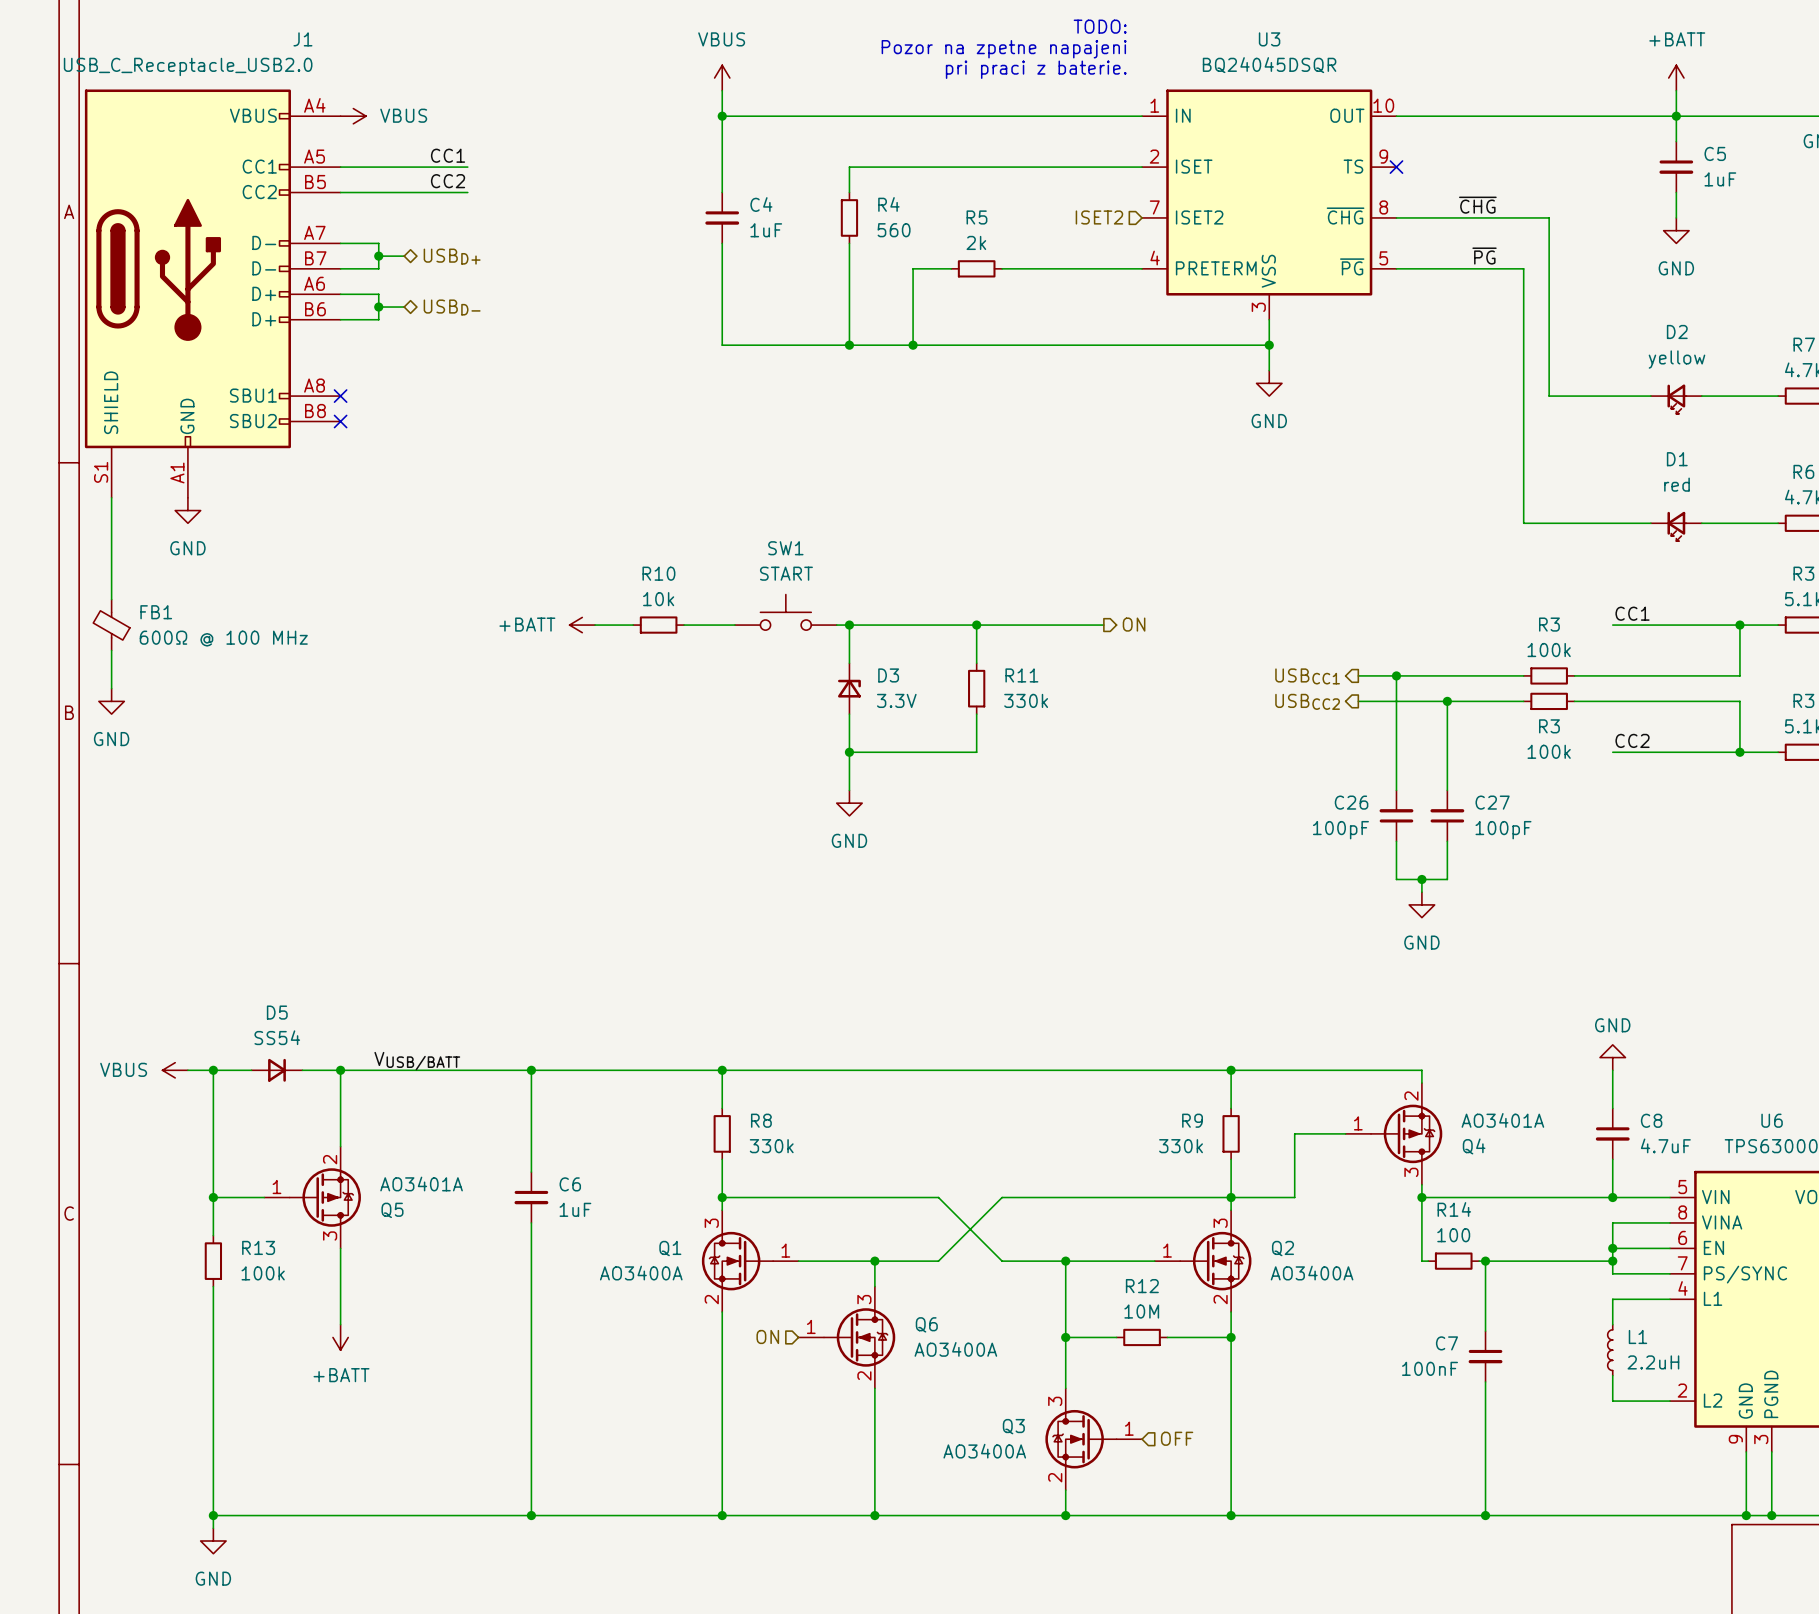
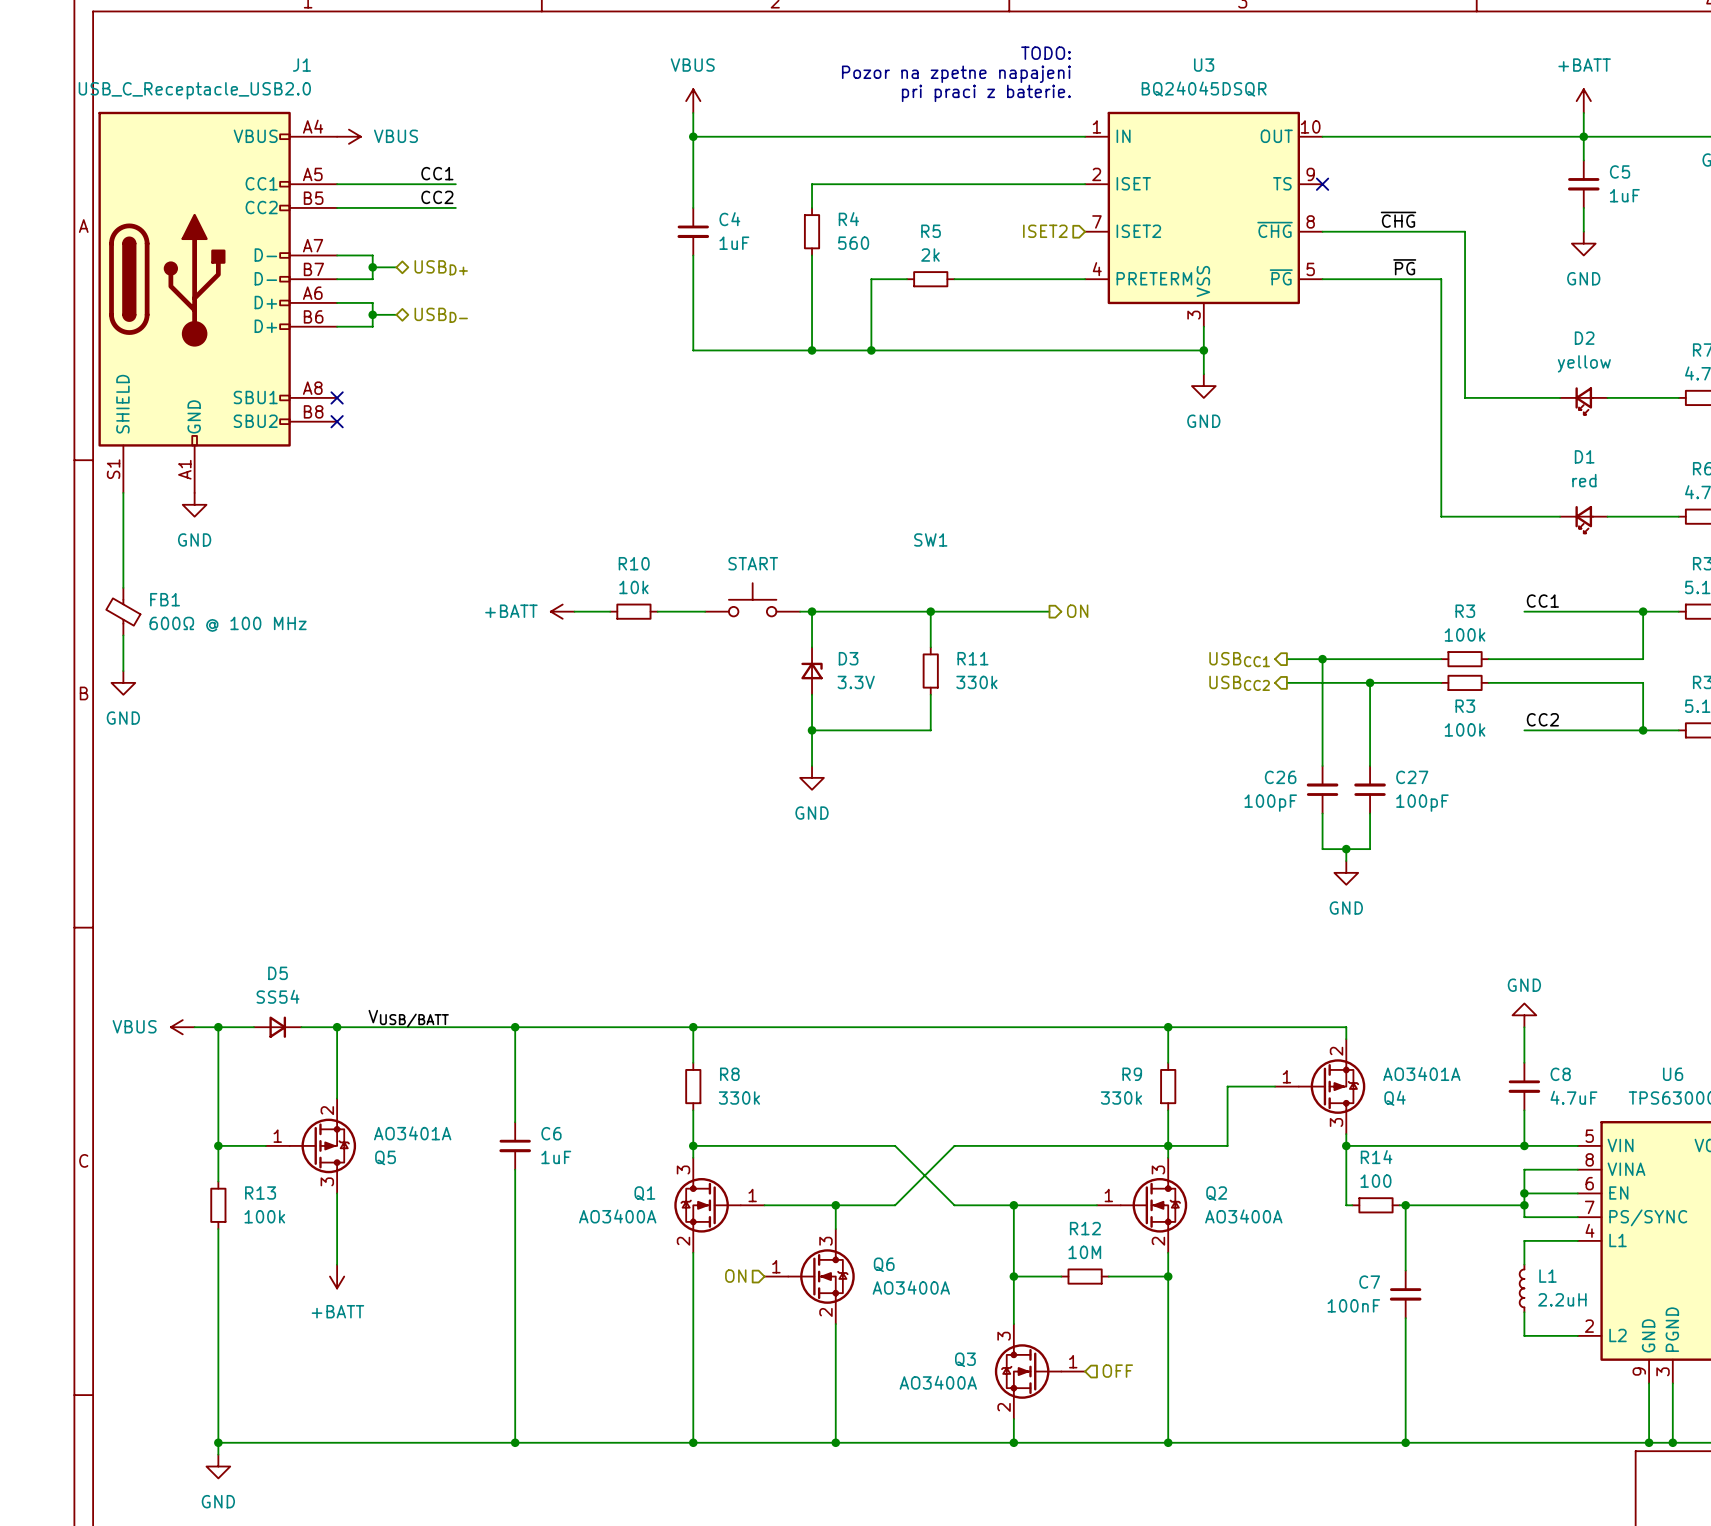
SW1 name position: SW1 (785, 548) -> SW1 (930, 539)

